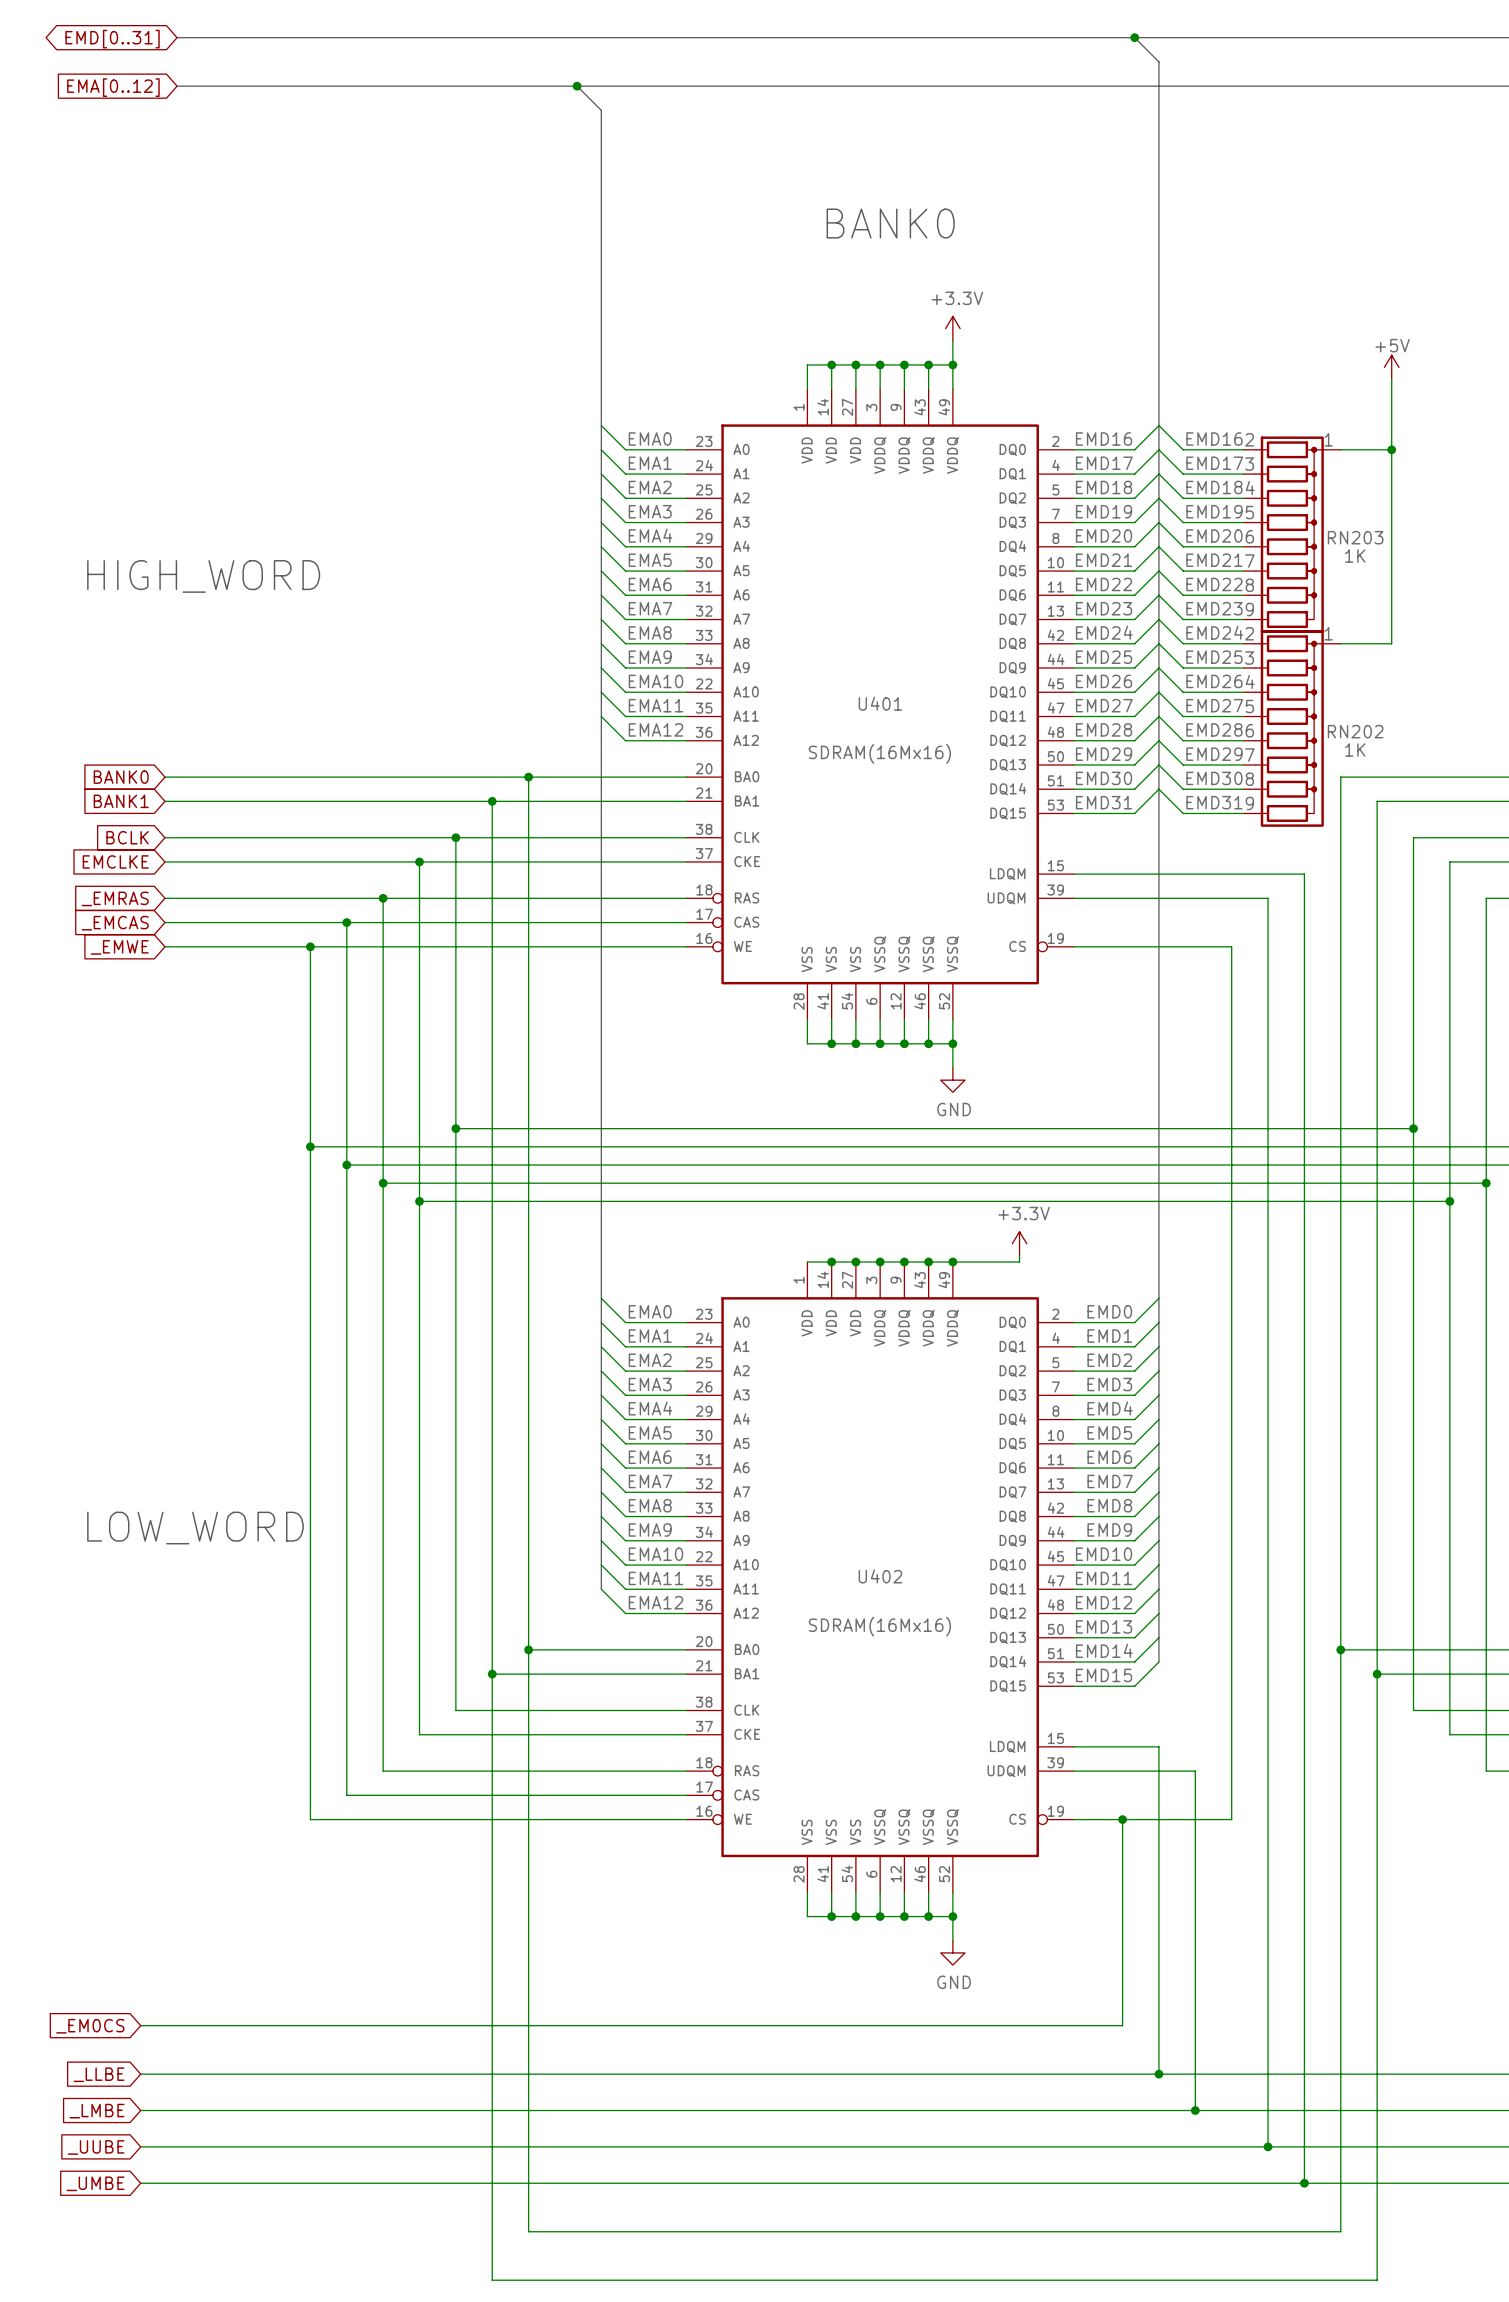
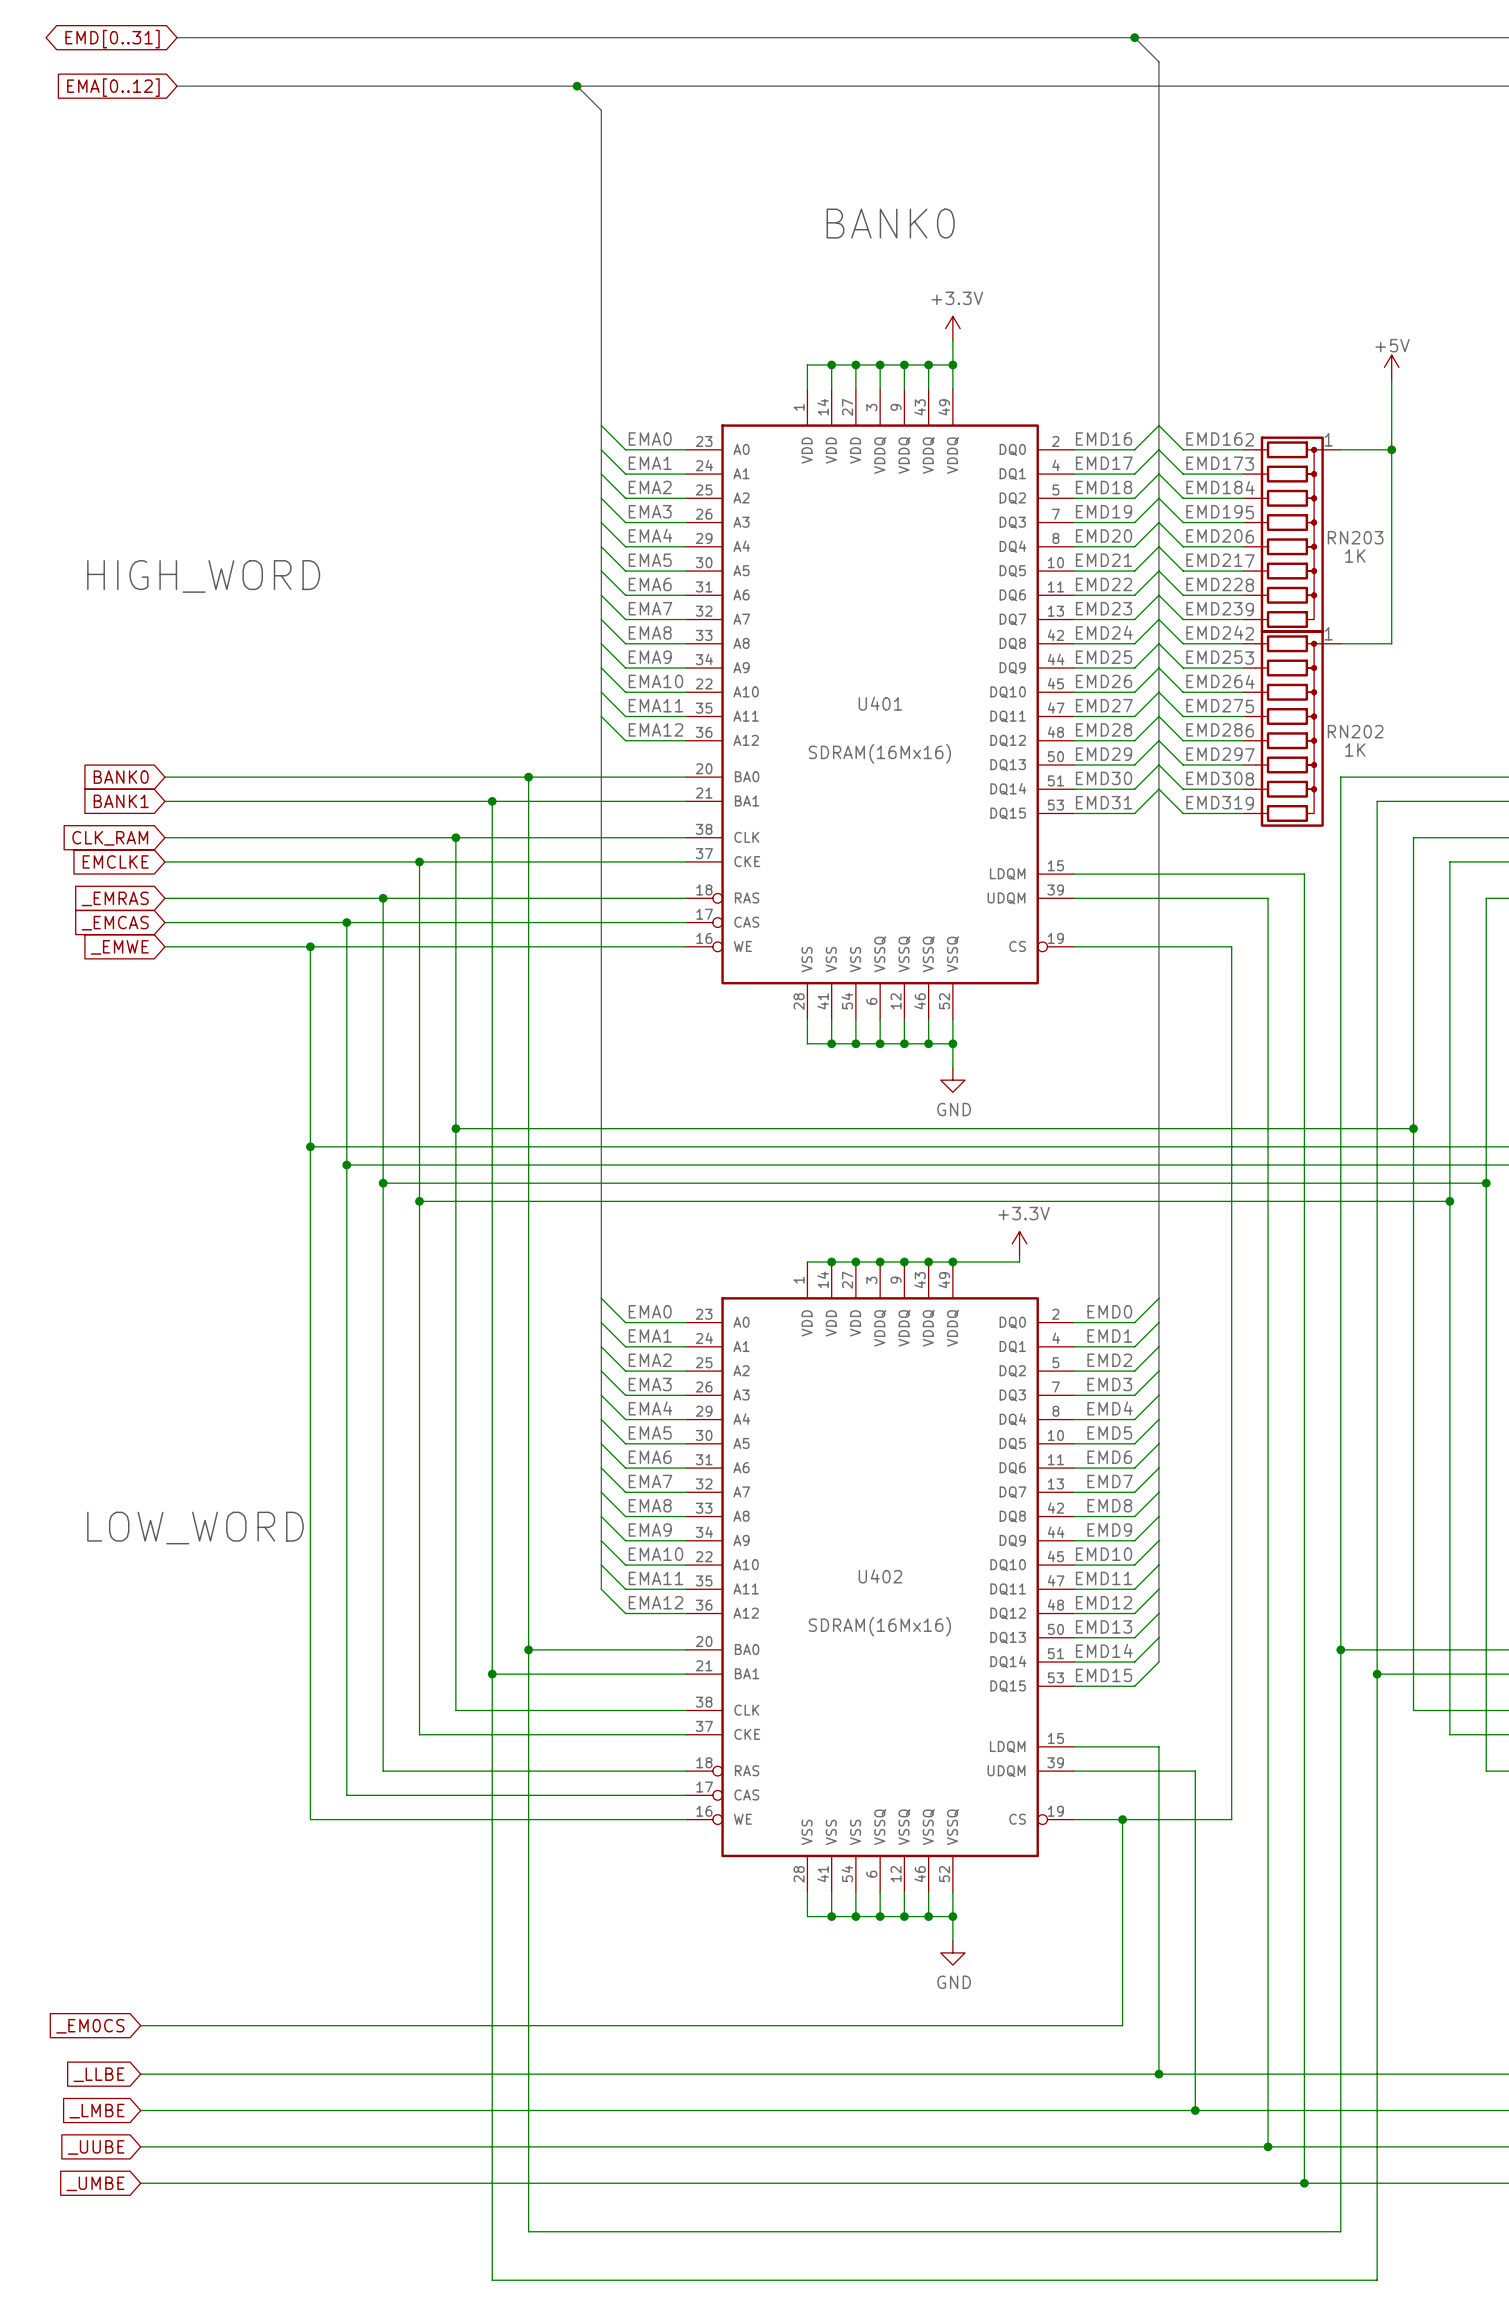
global label: BCLK (127, 837) -> CLK_RAM (110, 838)

